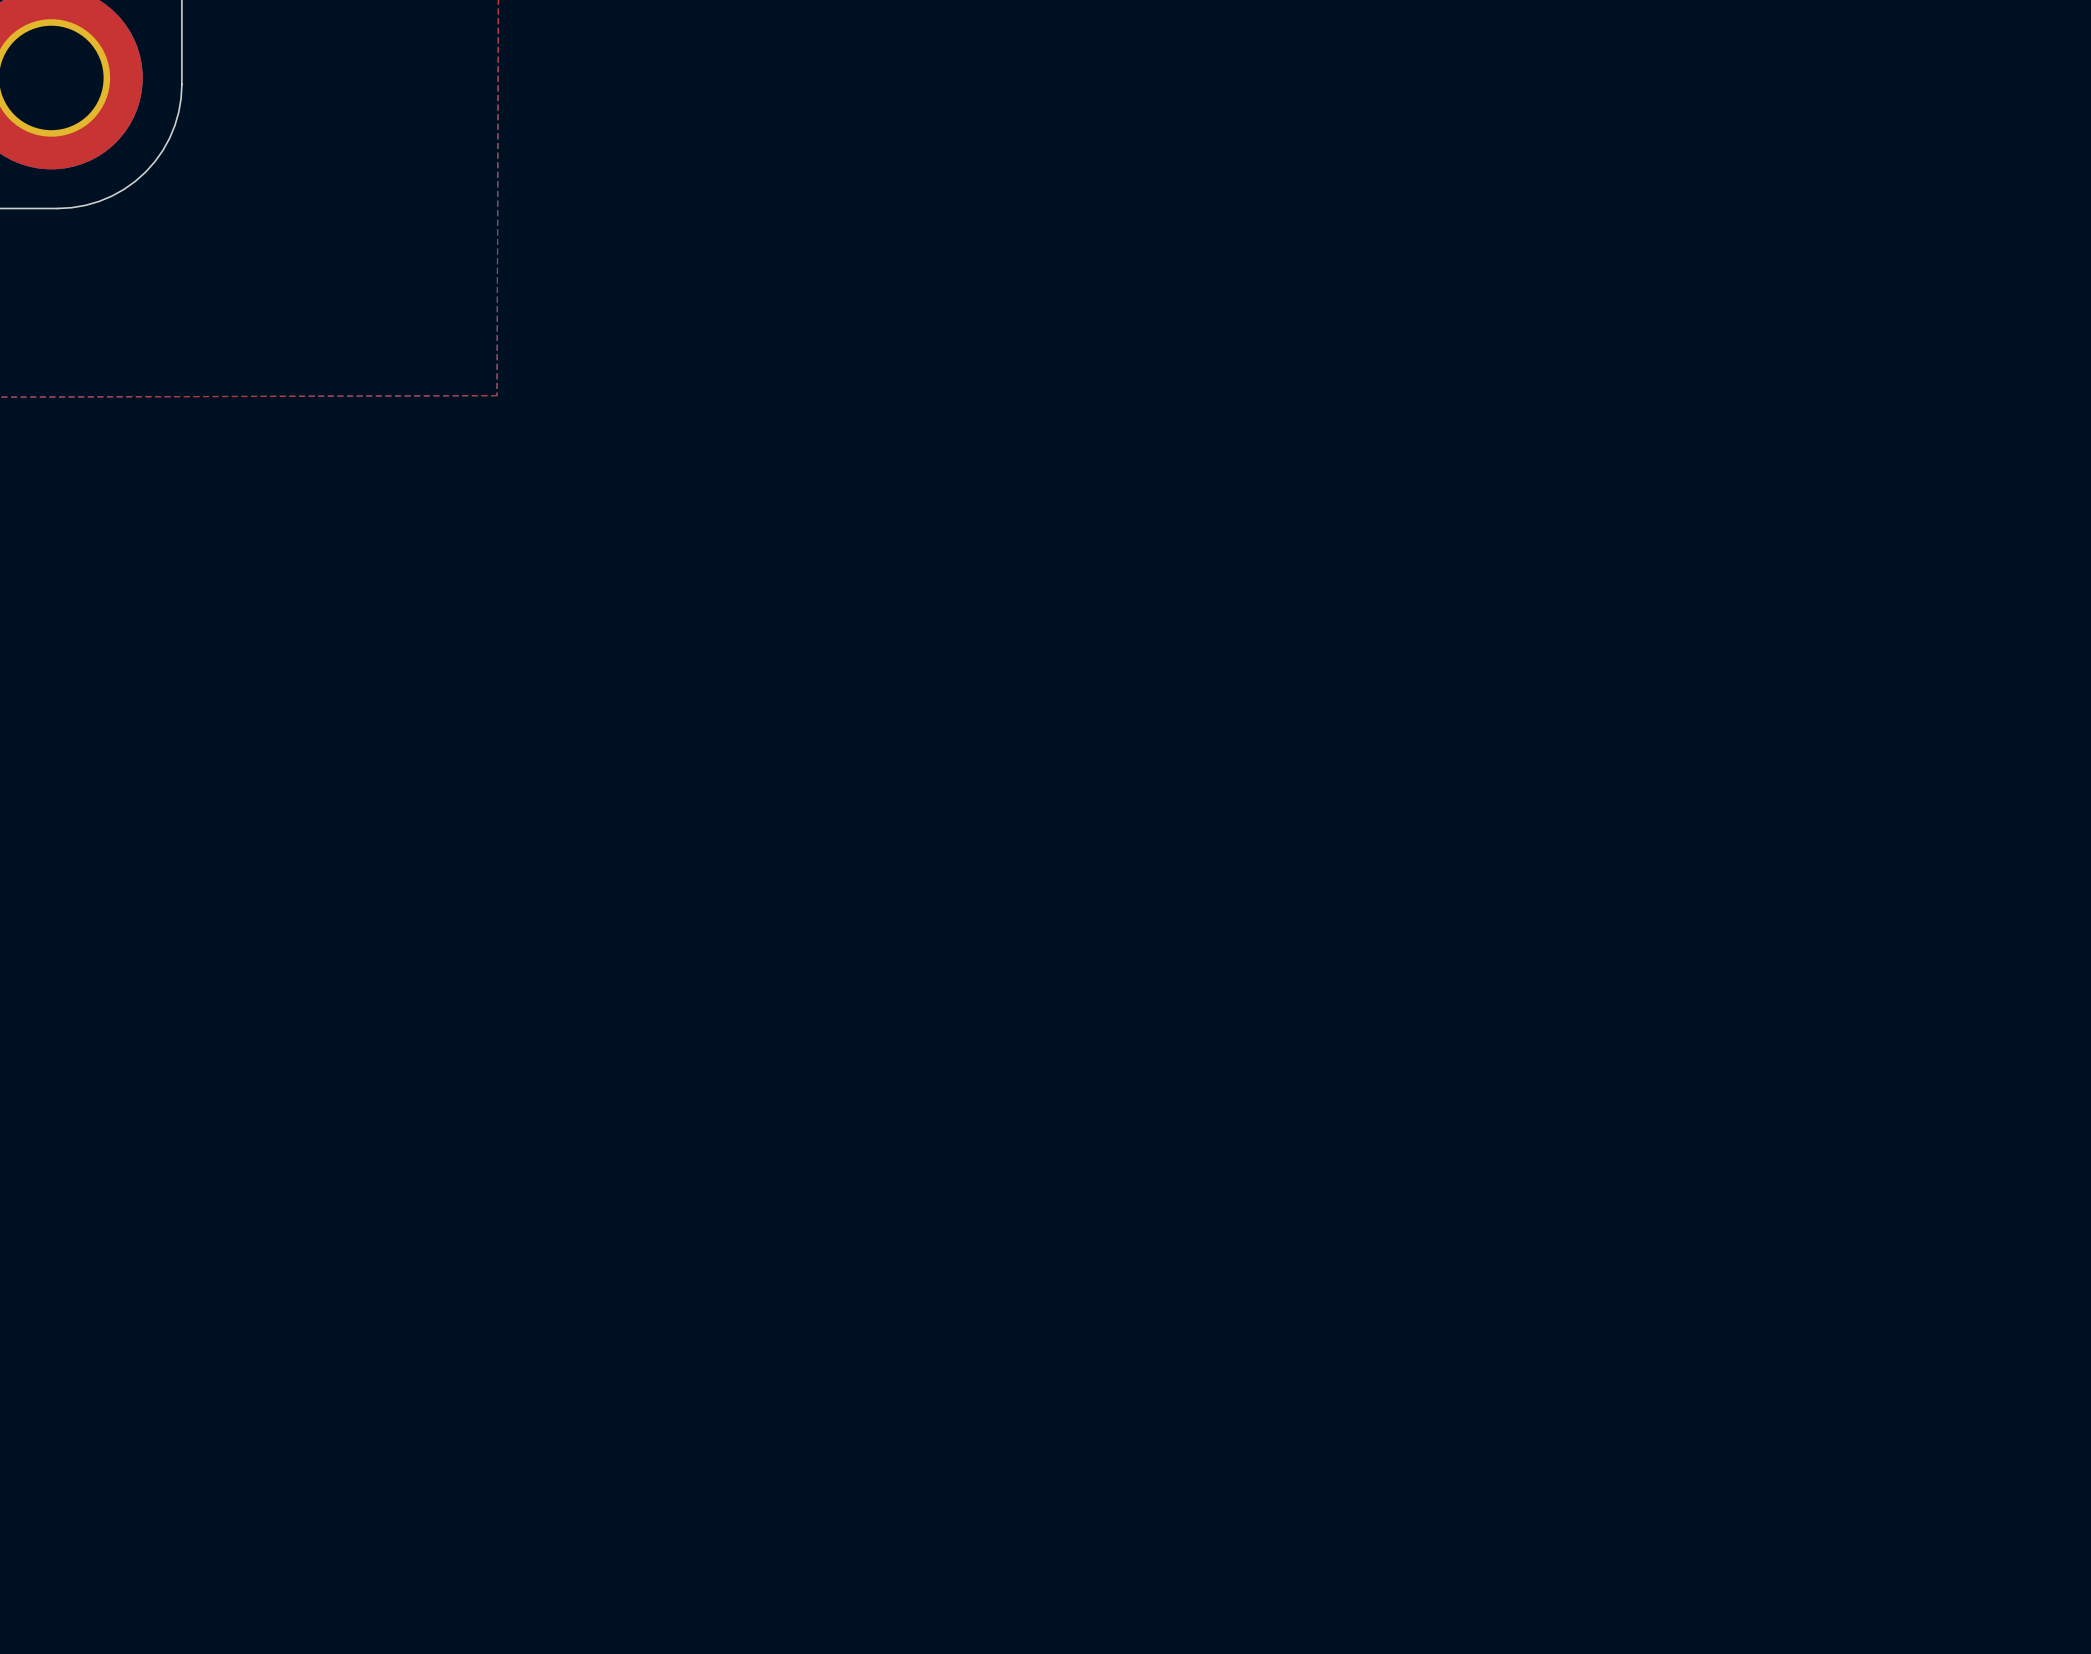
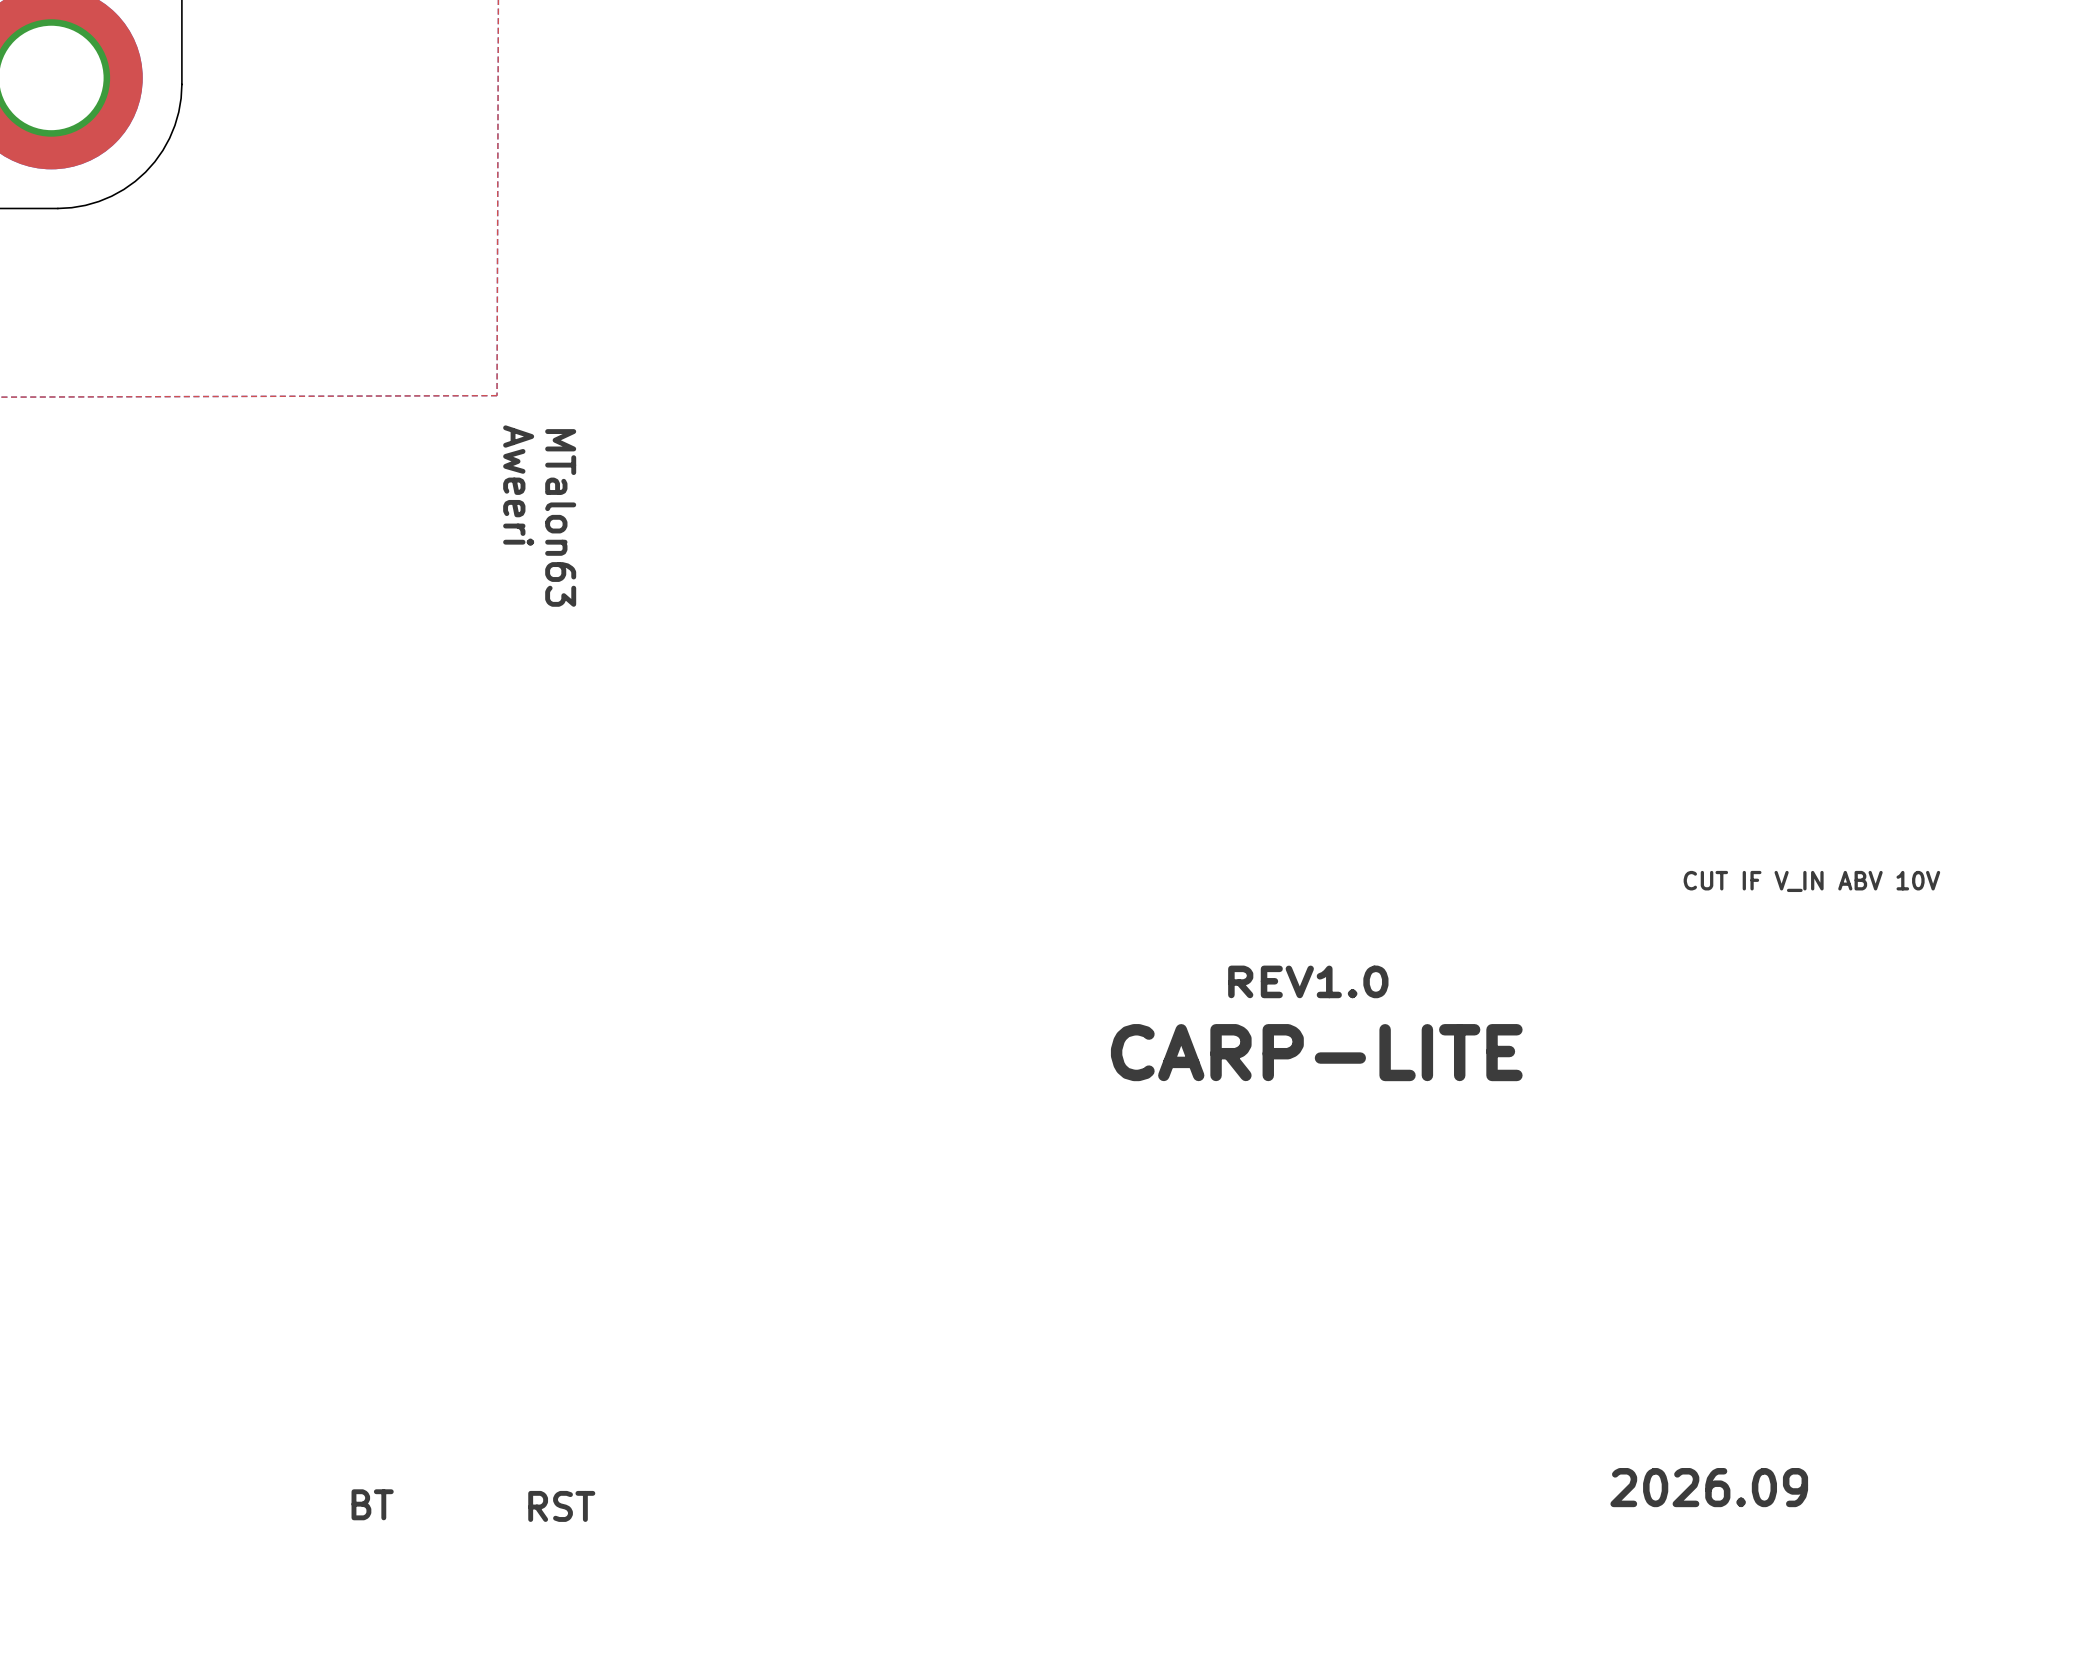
text: none -> Aweeri (518, 485)
text: none -> MTalon63 (560, 517)
text: none -> CUT IF V_IN ABV 10V (1811, 881)
text: none -> REV1.0 (1308, 981)
text: none -> CARP-LITE (1316, 1052)
text: none -> 2026.09 (1709, 1487)
text: none -> BT (372, 1504)
text: none -> RST (561, 1506)

